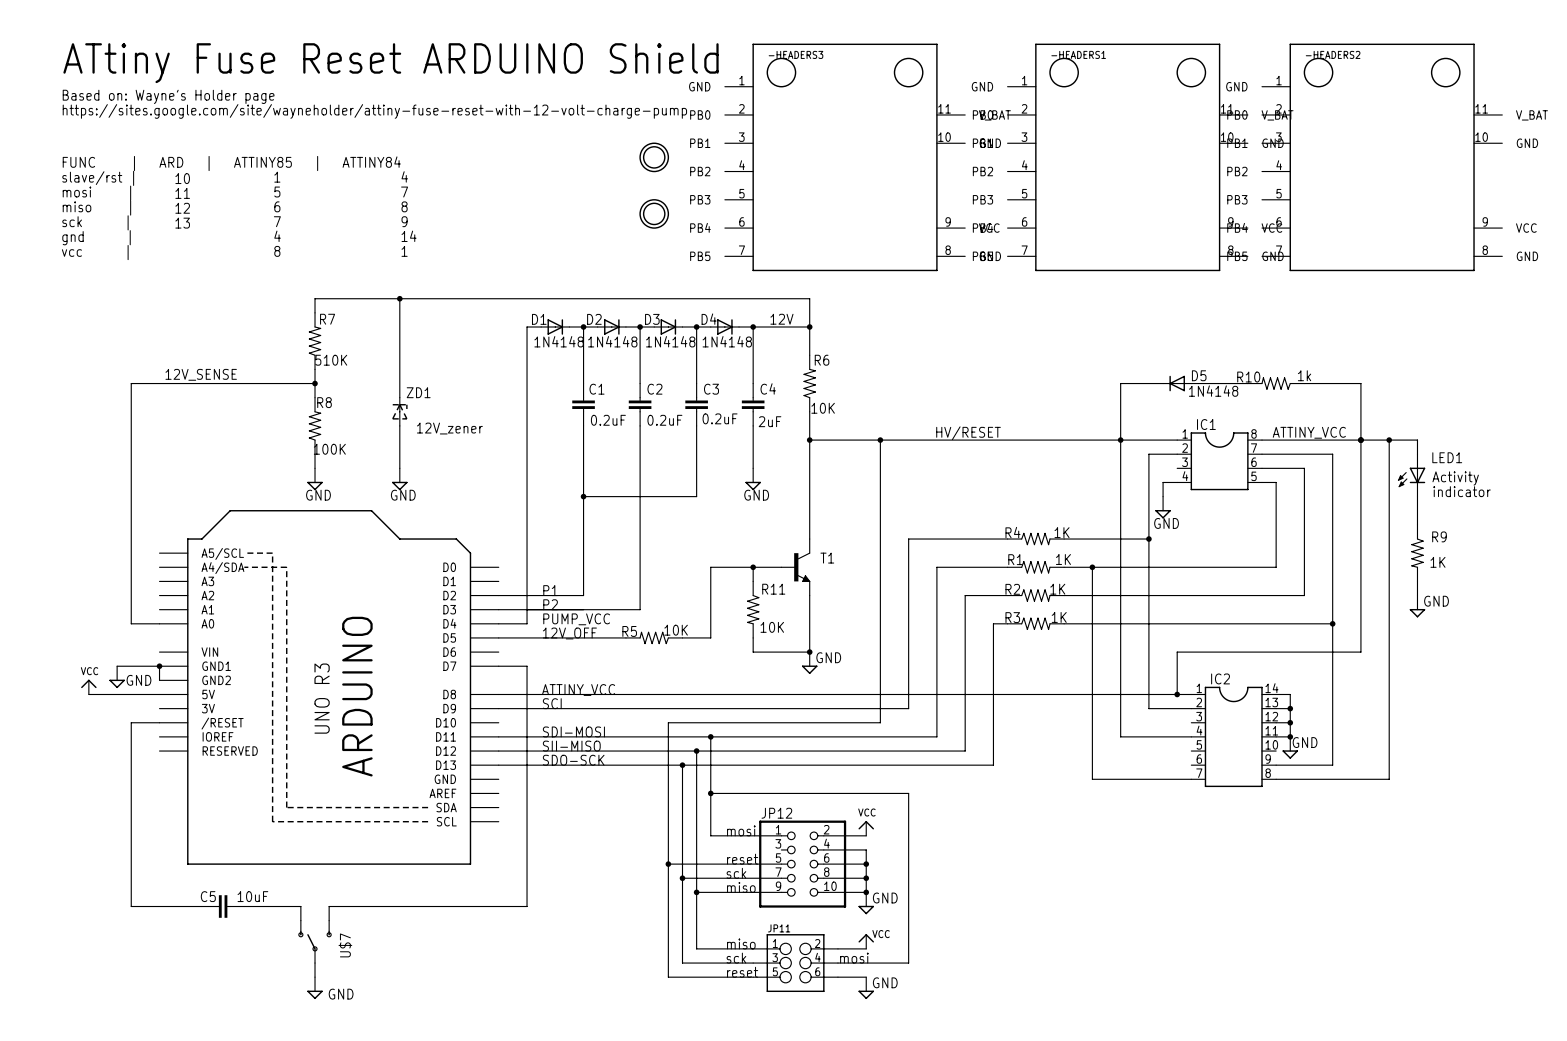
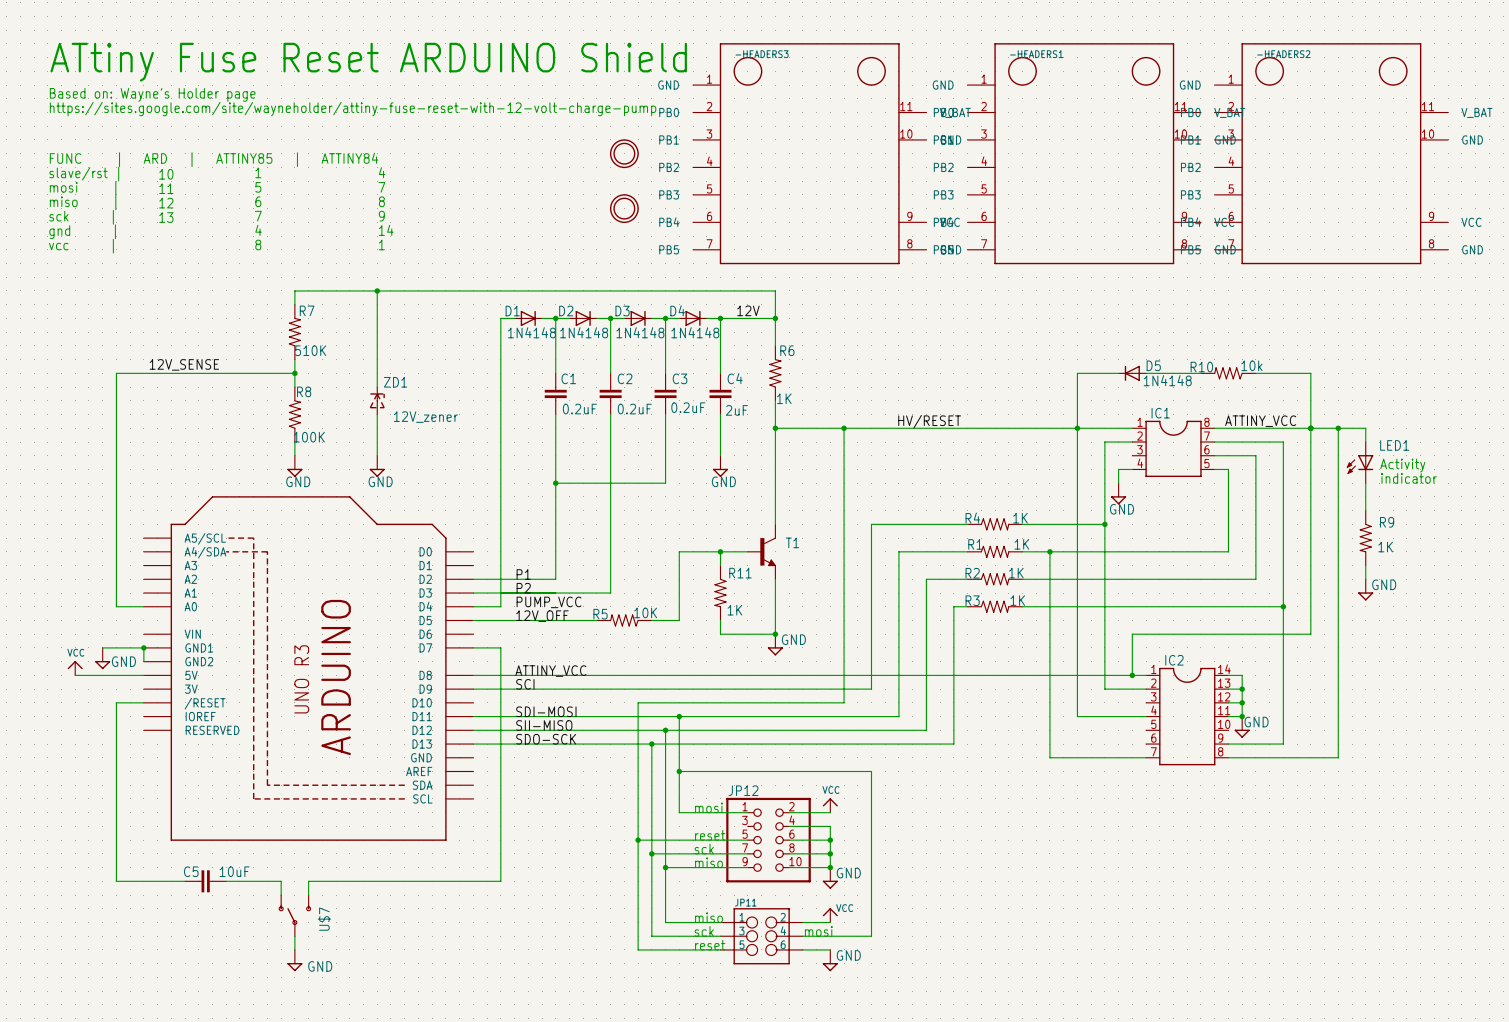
R10 value: 1k (1304, 375) -> 10k (1251, 365)
R6 value: 10K (823, 408) -> 1K (784, 398)
R11 value: 10K (772, 627) -> 1K (734, 610)

